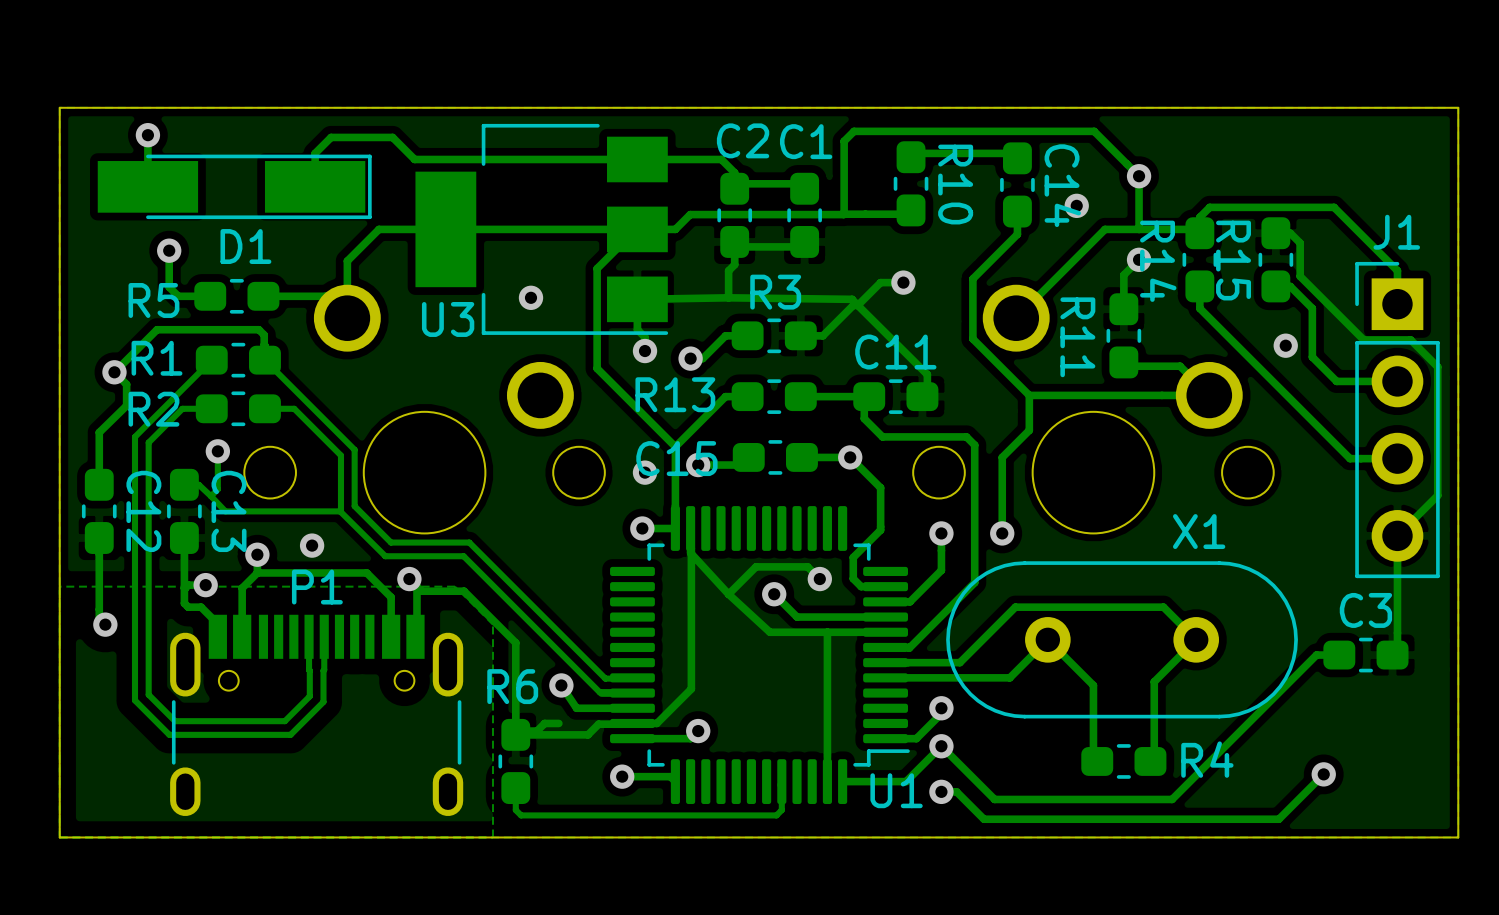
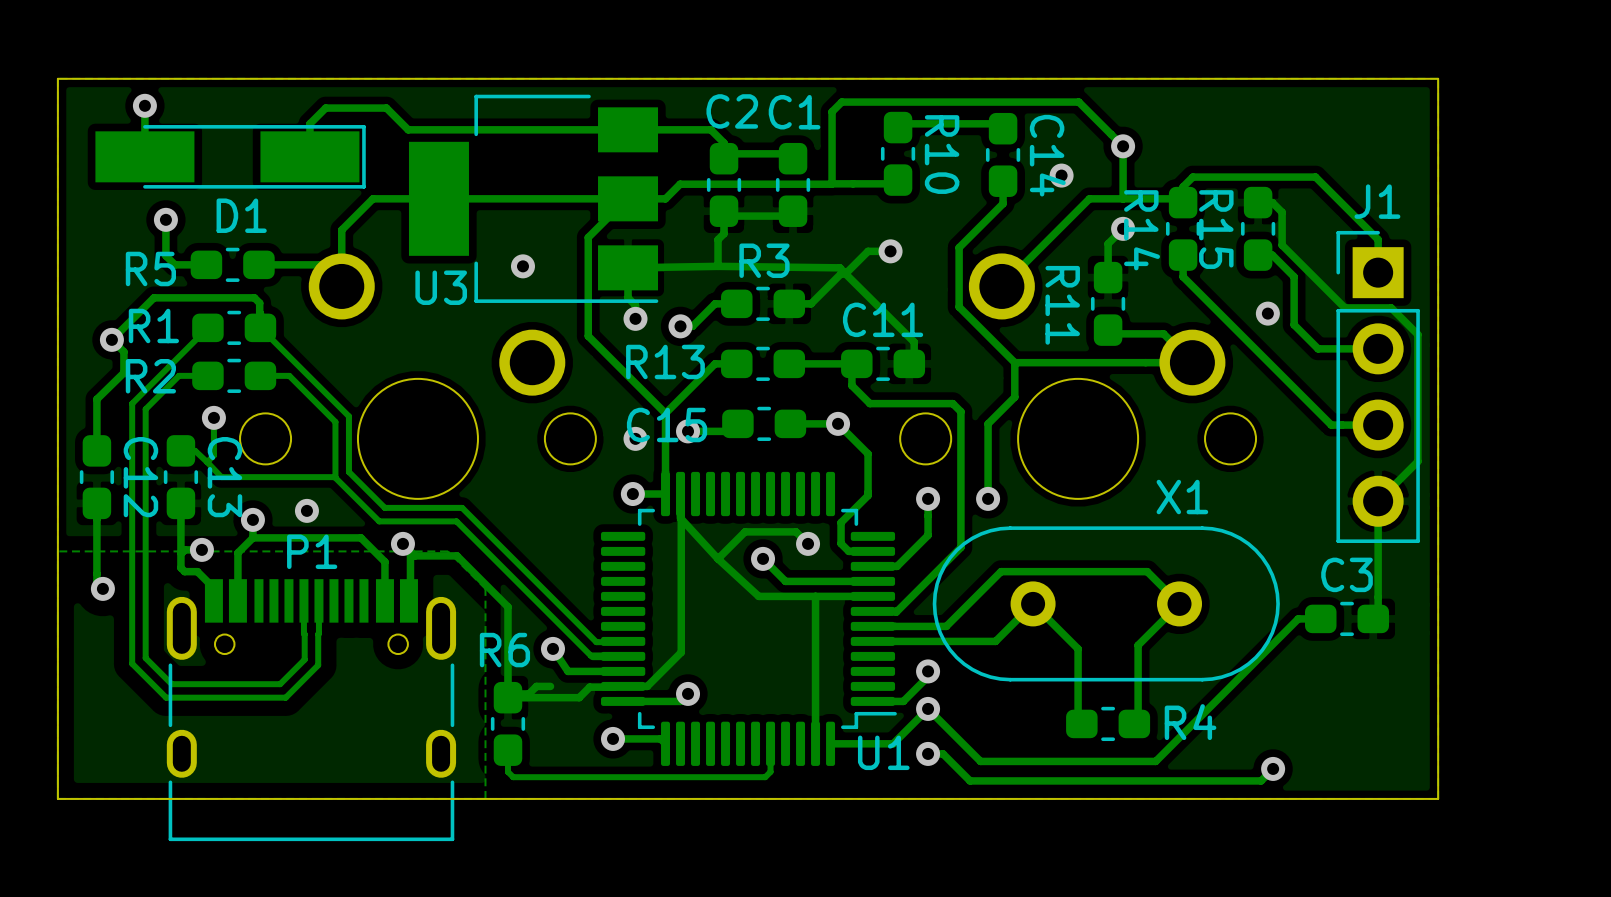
P1 footprint: [170, 614, 464, 817] -> [166, 579, 457, 842]
track: (1323, 774) (1291, 807) -> none
via position: (1323, 774) -> (1273, 768)

